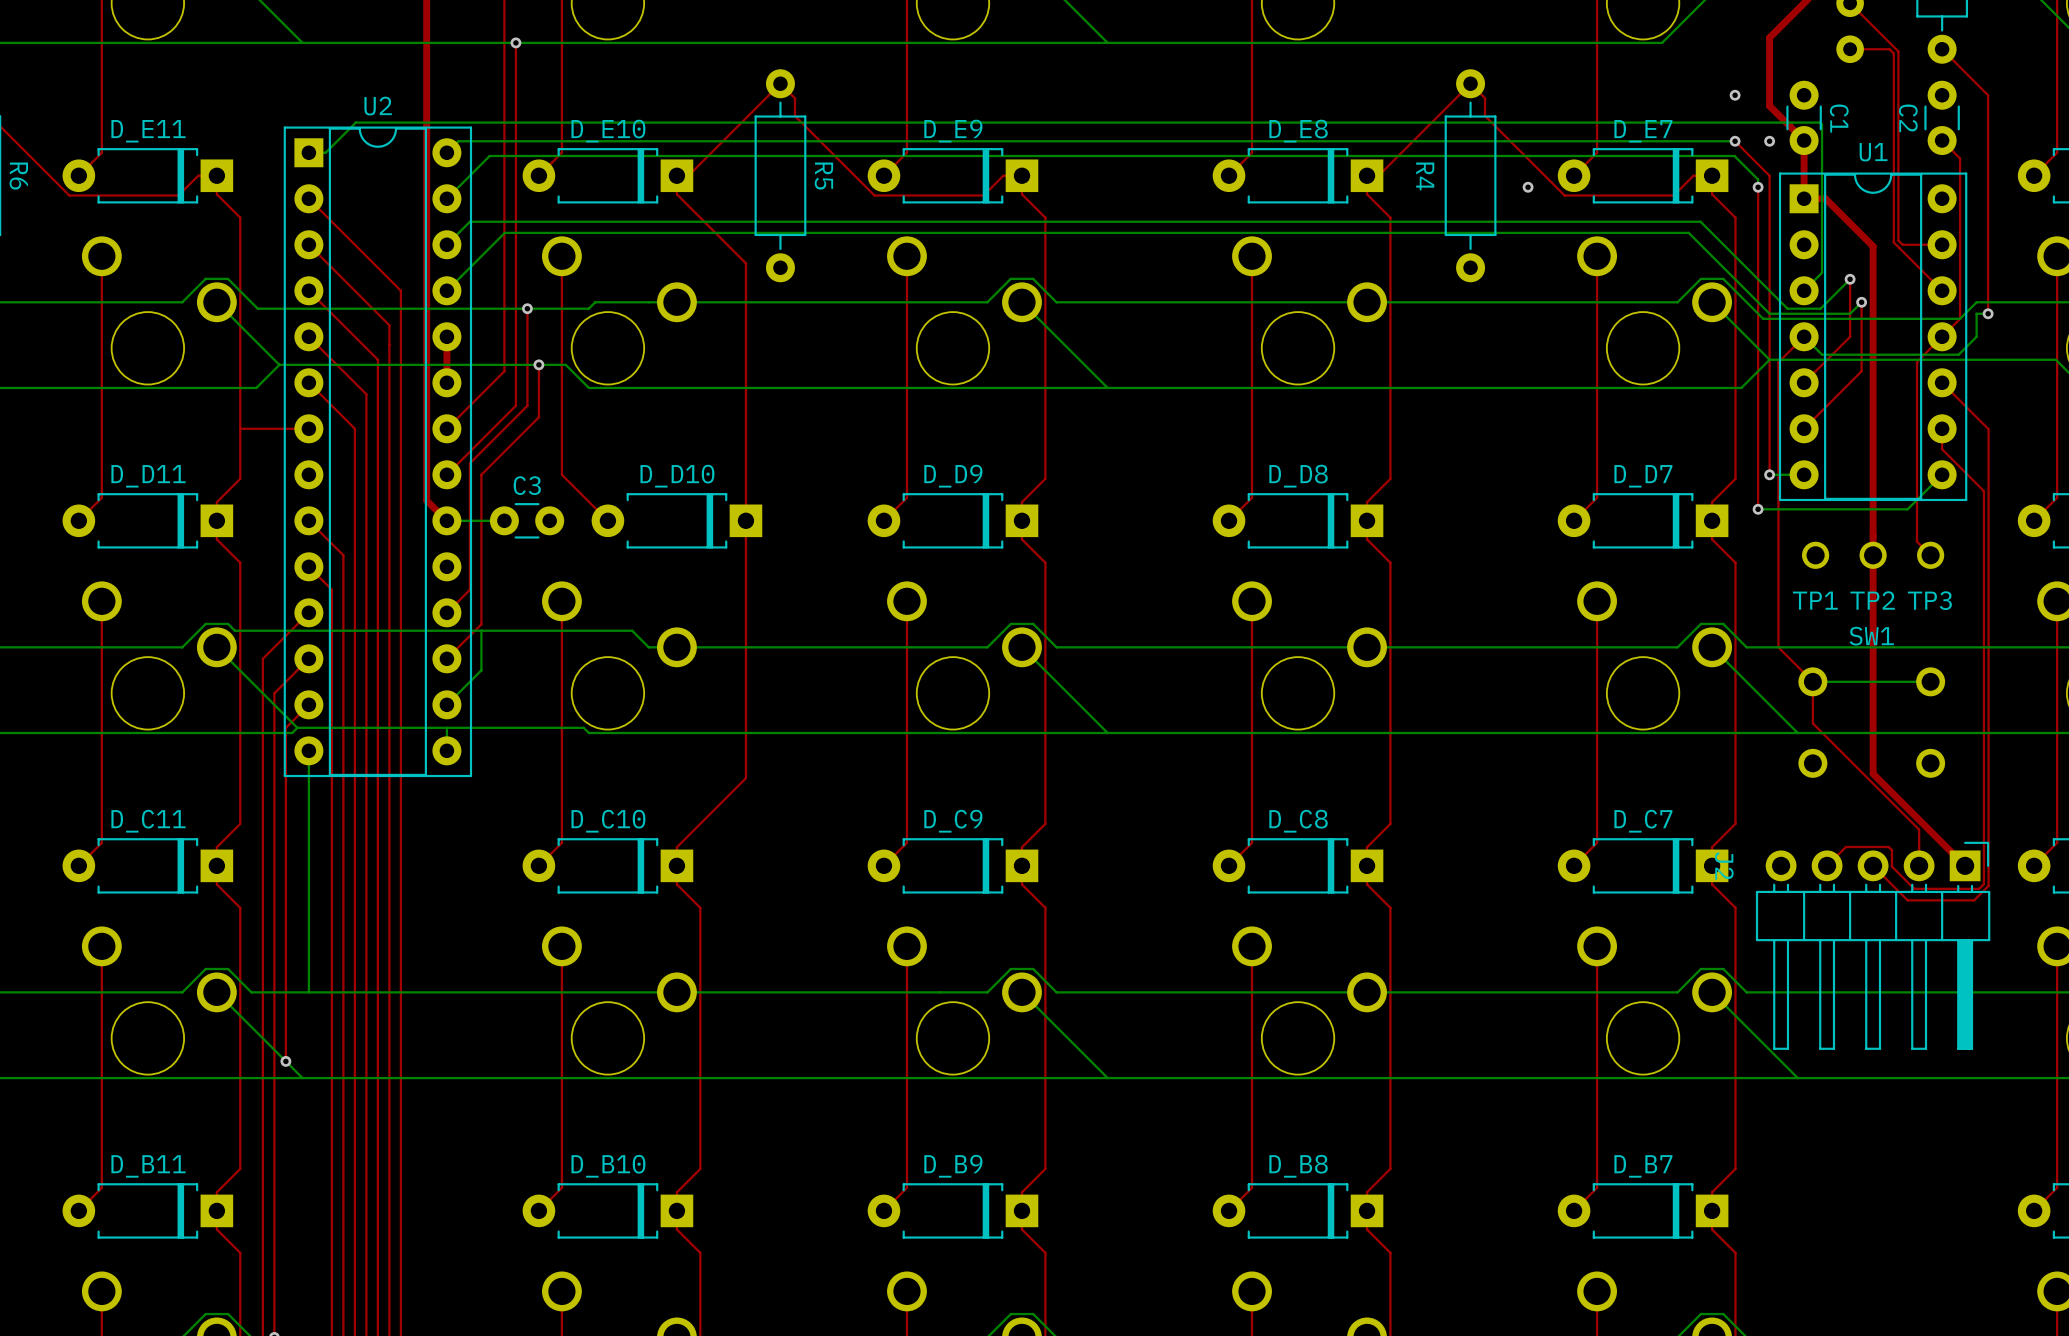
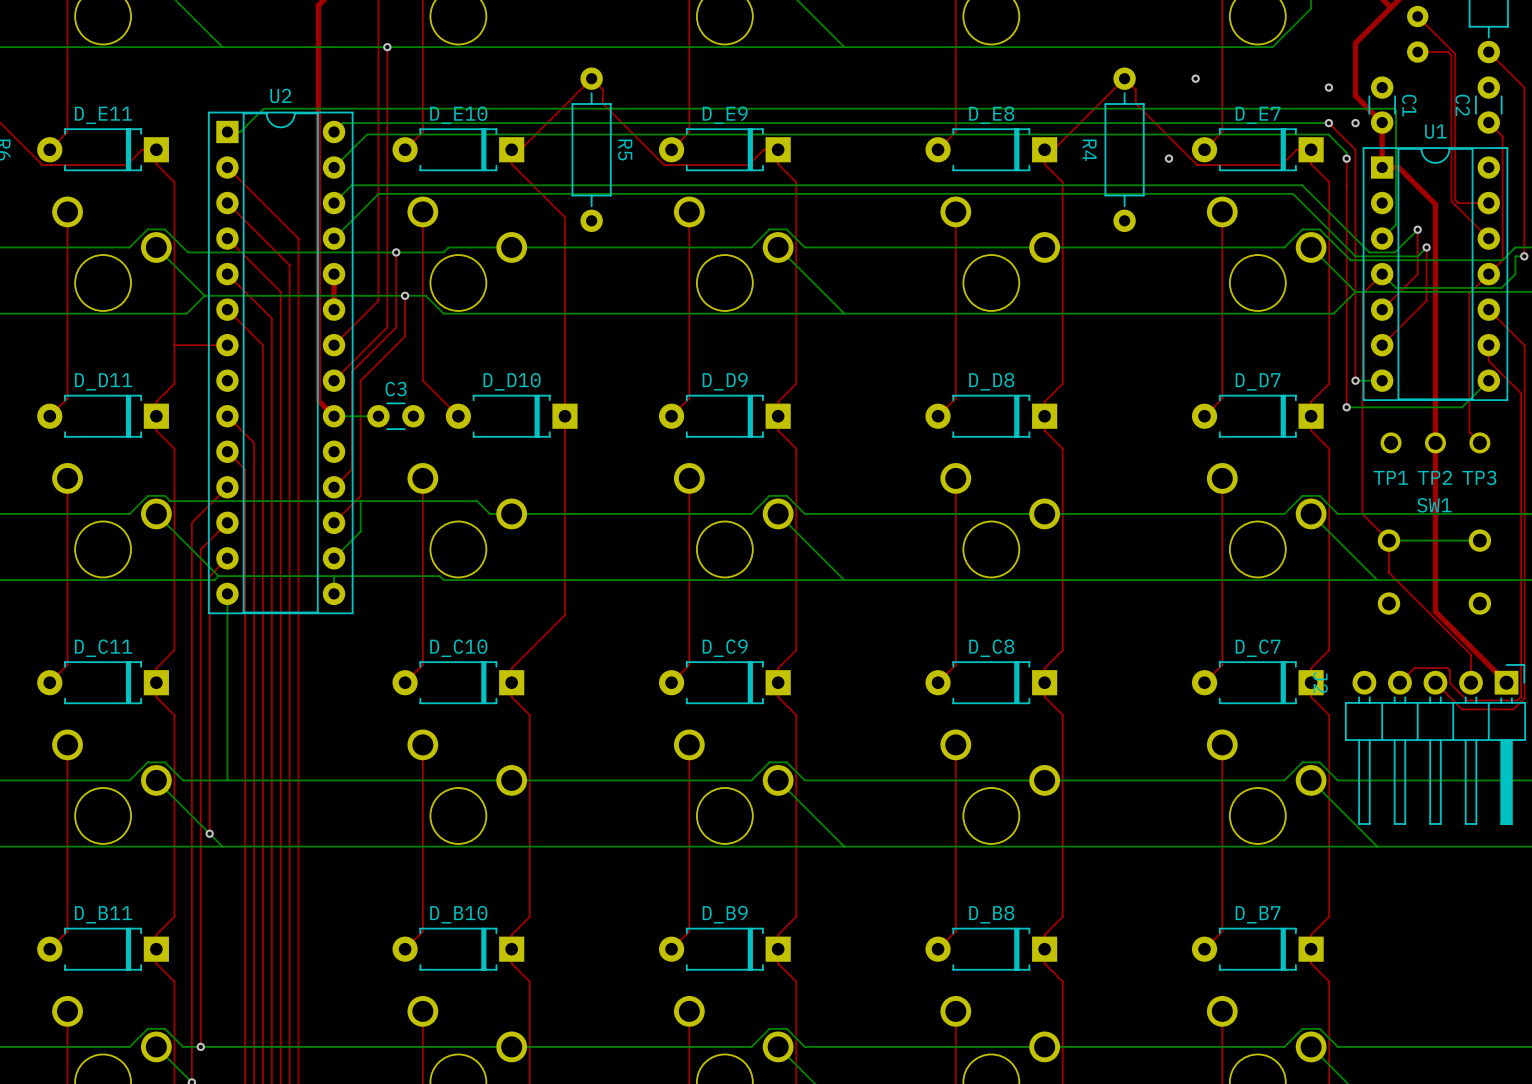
via: none -> (1195, 78)

